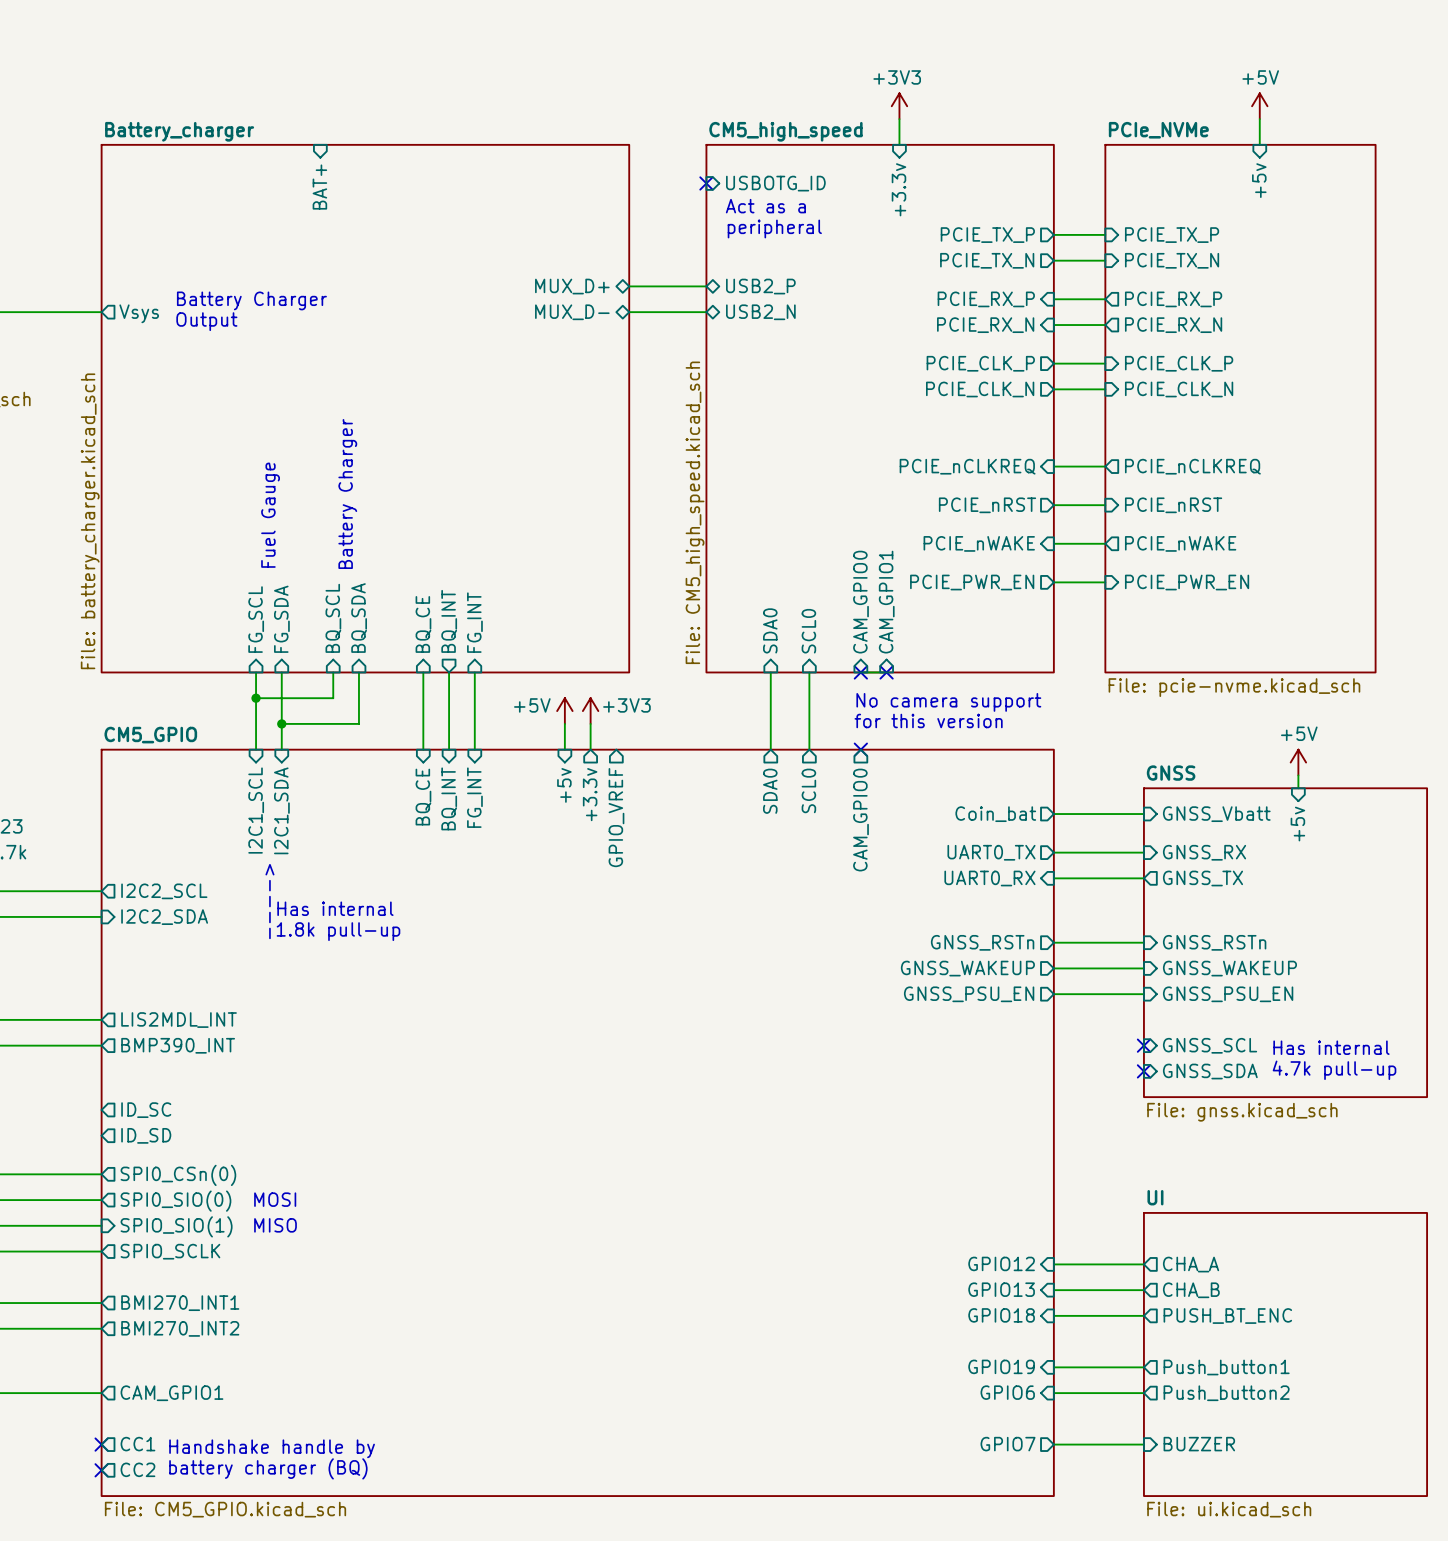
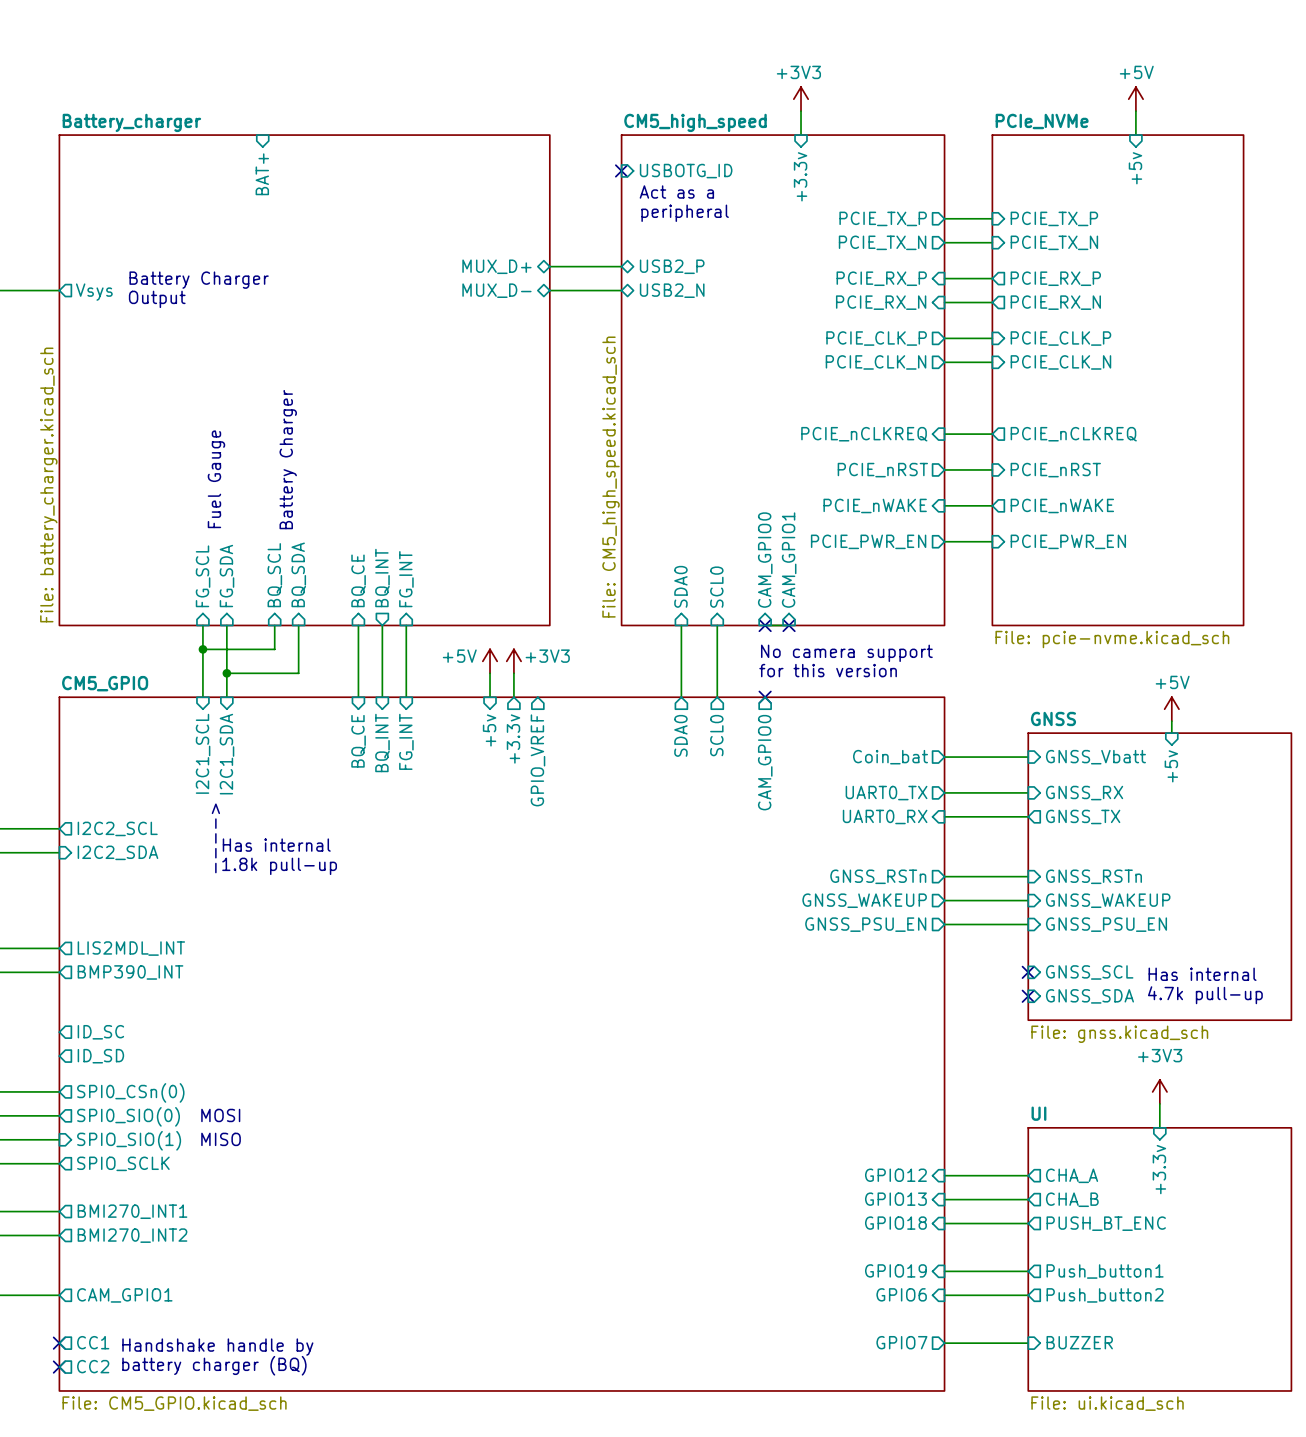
power symbol: none -> +3V3 (1159, 1091)
wire: none -> (1159, 1103) (1159, 1127)
sheet pin: none -> +3.3v (1159, 1169)

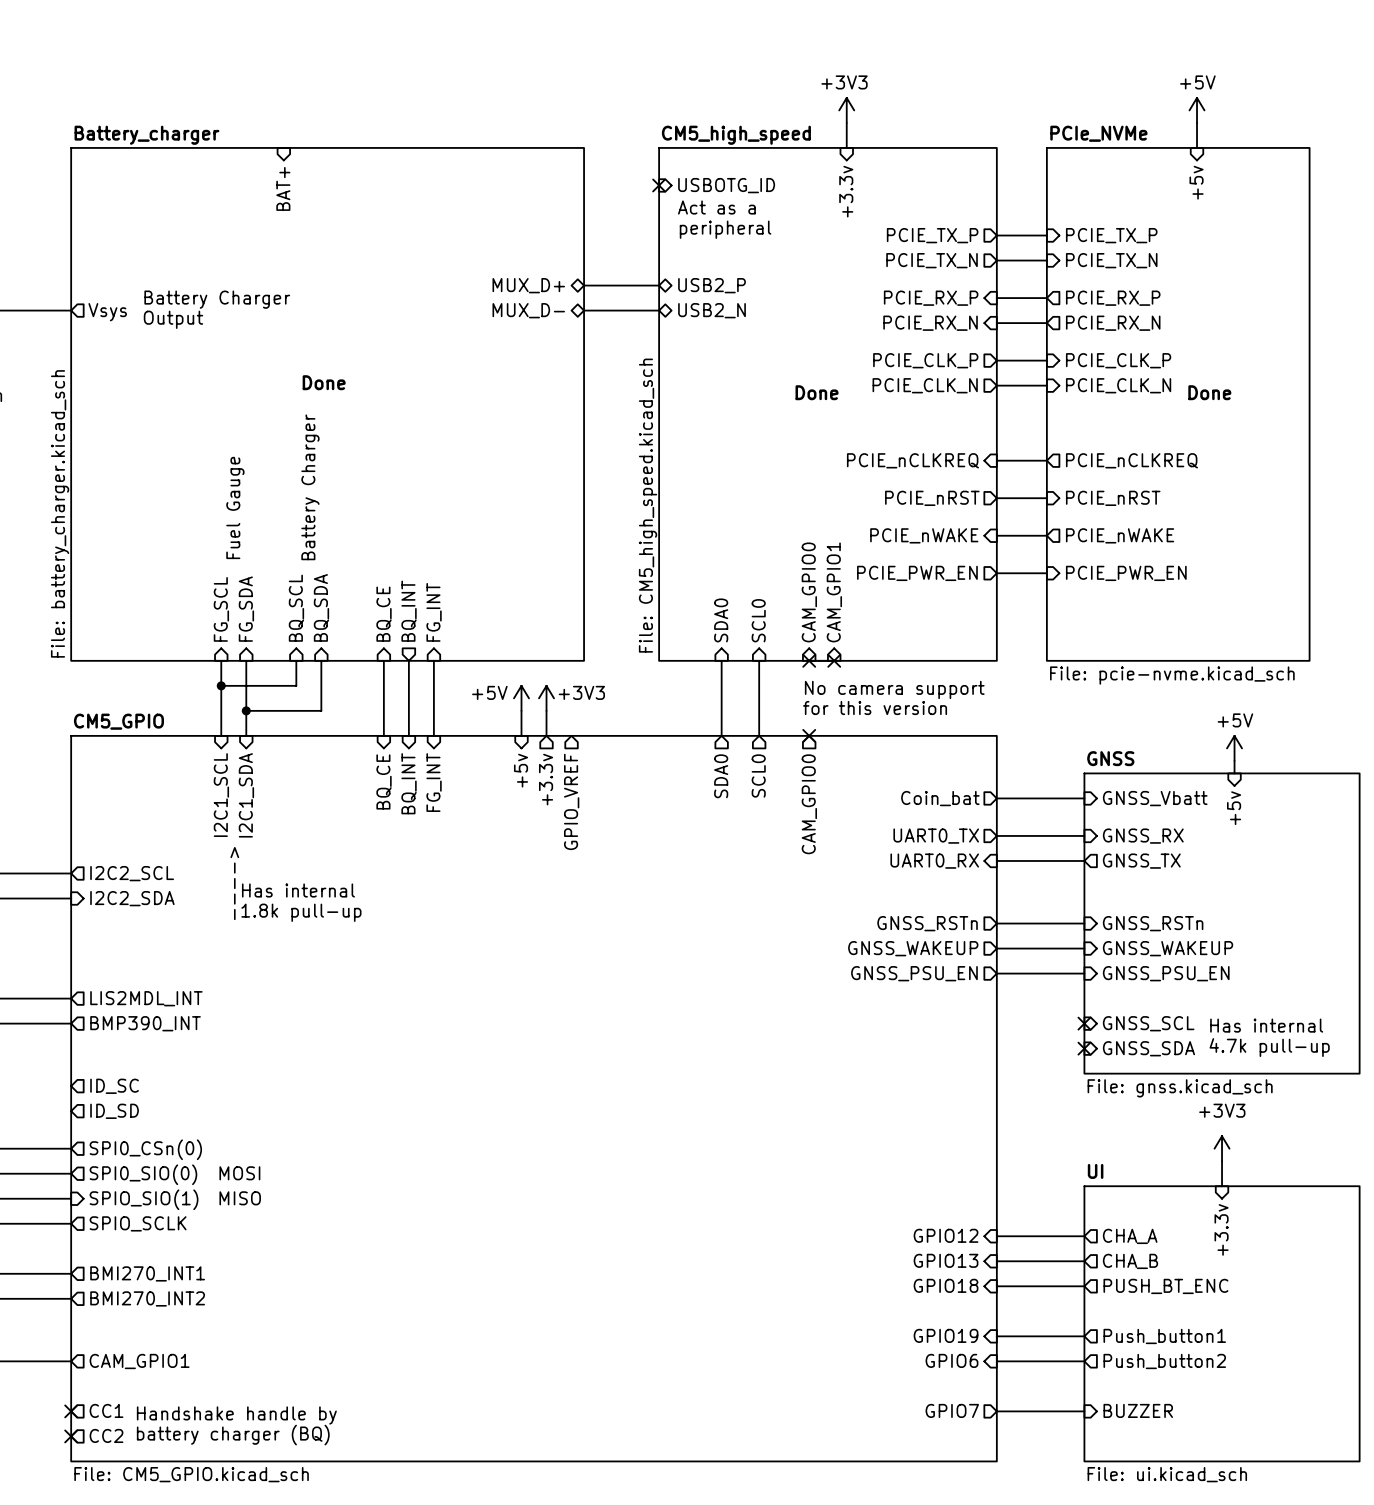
text: none -> Done (324, 382)
text: none -> Done (817, 392)
text: none -> Done (1209, 392)

